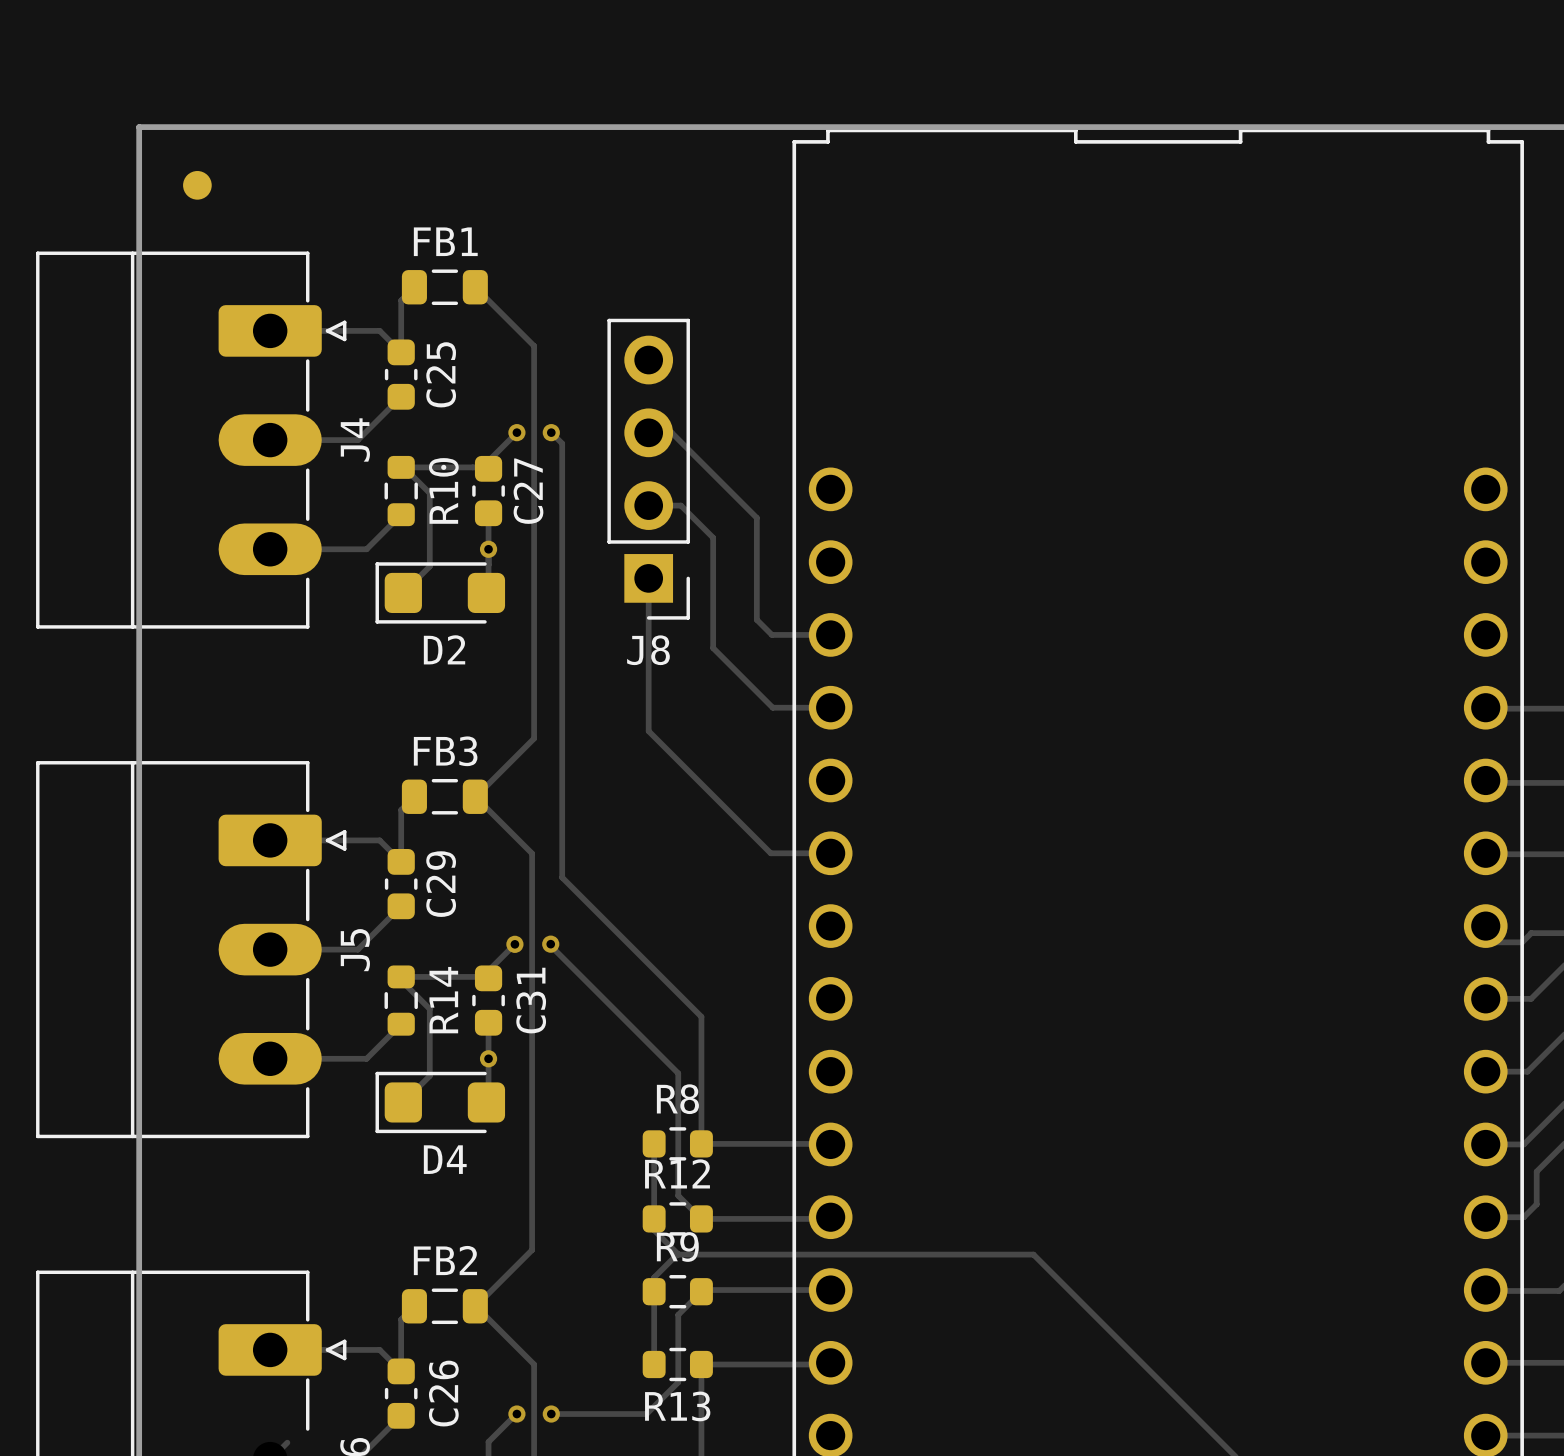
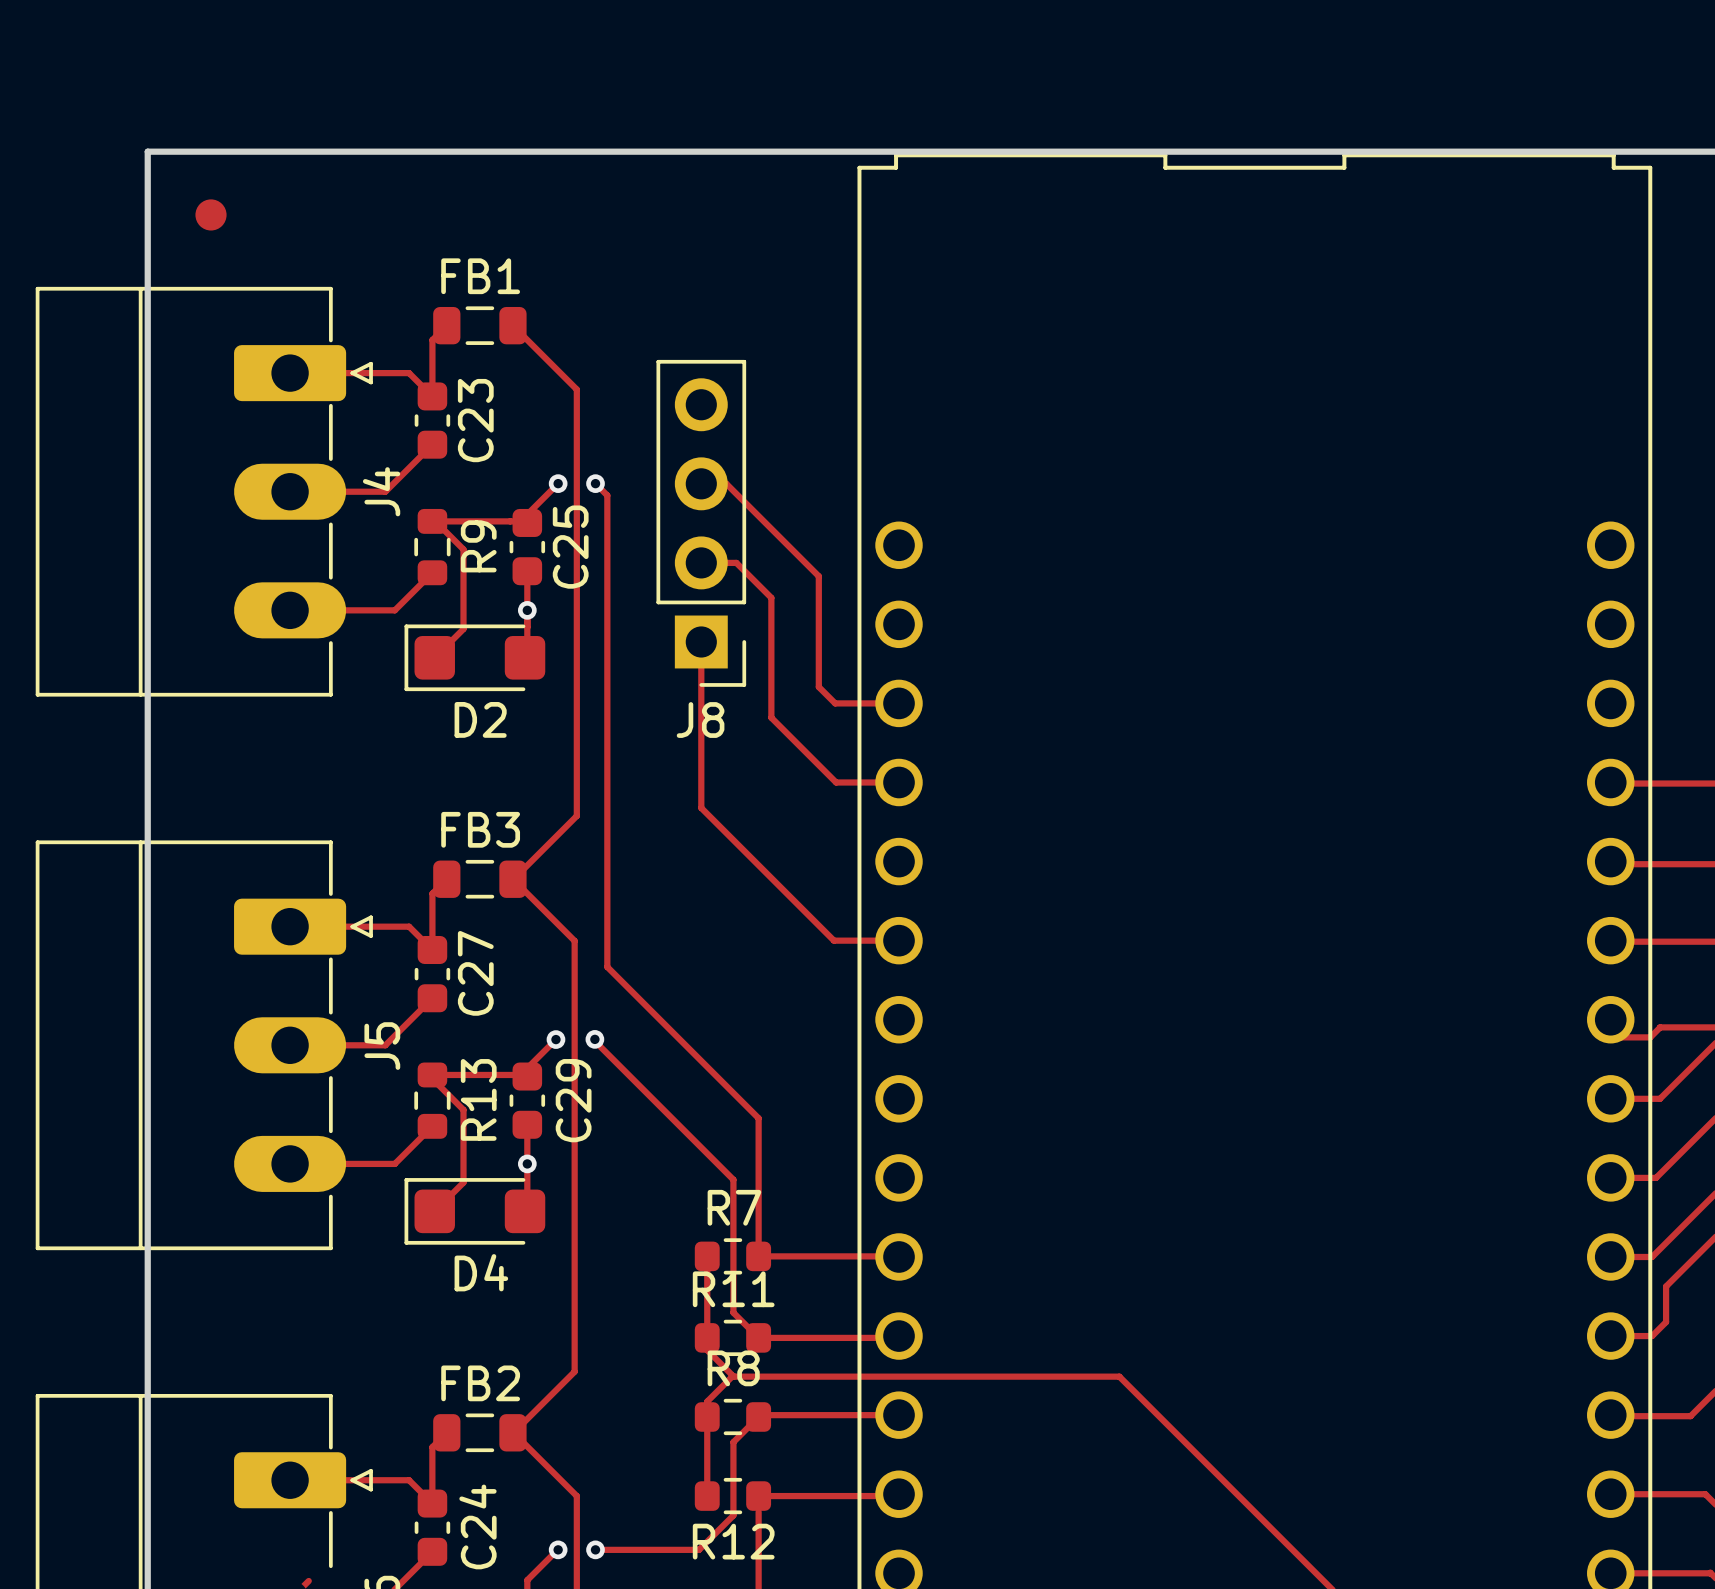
C25 name: C25 (441, 374) -> C23 (475, 420)
R10 name: R10 (443, 490) -> R9 (478, 546)
C27 name: C27 (528, 491) -> C25 (570, 547)
C29 name: C29 (441, 884) -> C27 (475, 973)
R14 name: R14 (443, 1000) -> R13 (478, 1099)
C31 name: C31 (531, 1000) -> C29 (573, 1100)
R8 name: R8 (677, 1099) -> R7 (734, 1207)
R12 name: R12 (677, 1173) -> R11 (733, 1289)
R9 name: R9 (677, 1246) -> R8 (733, 1368)
C26 name: C26 (443, 1393) -> C24 (477, 1526)
R13 name: R13 (677, 1406) -> R12 (733, 1541)

